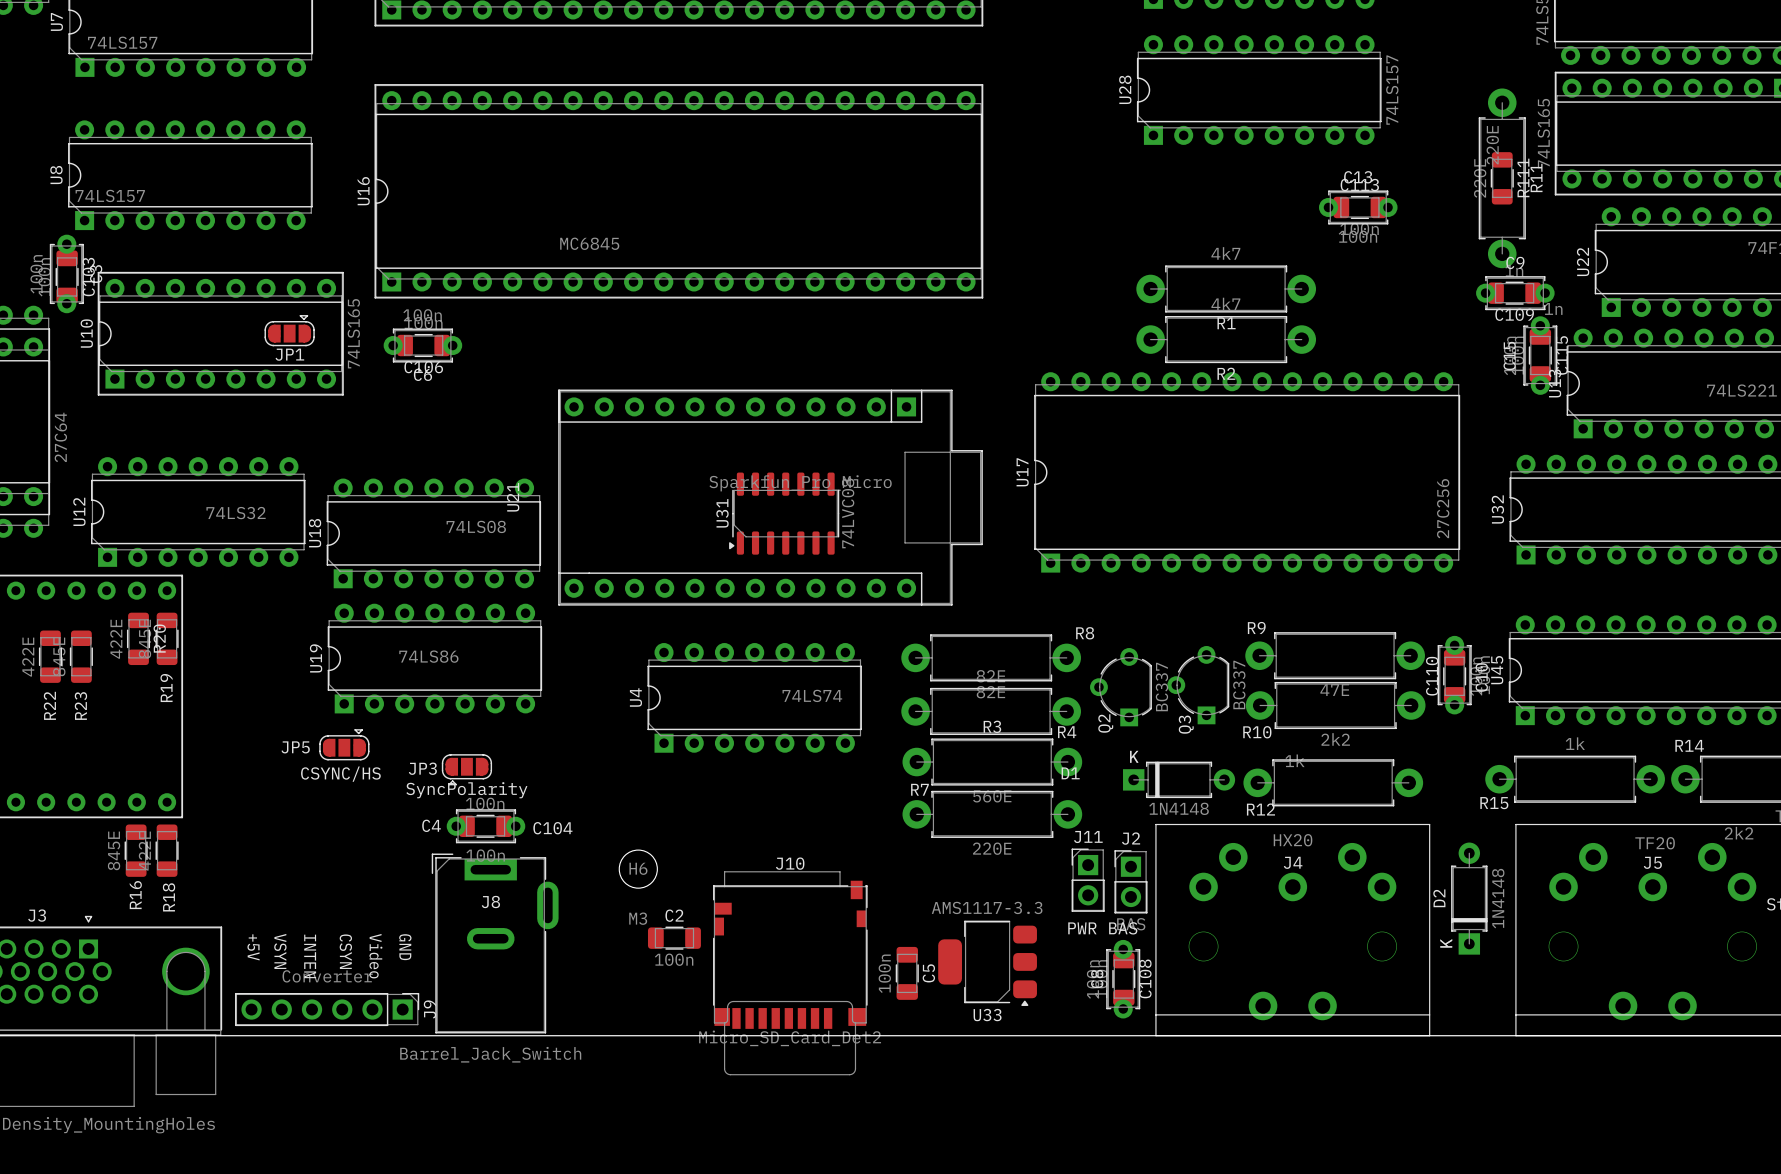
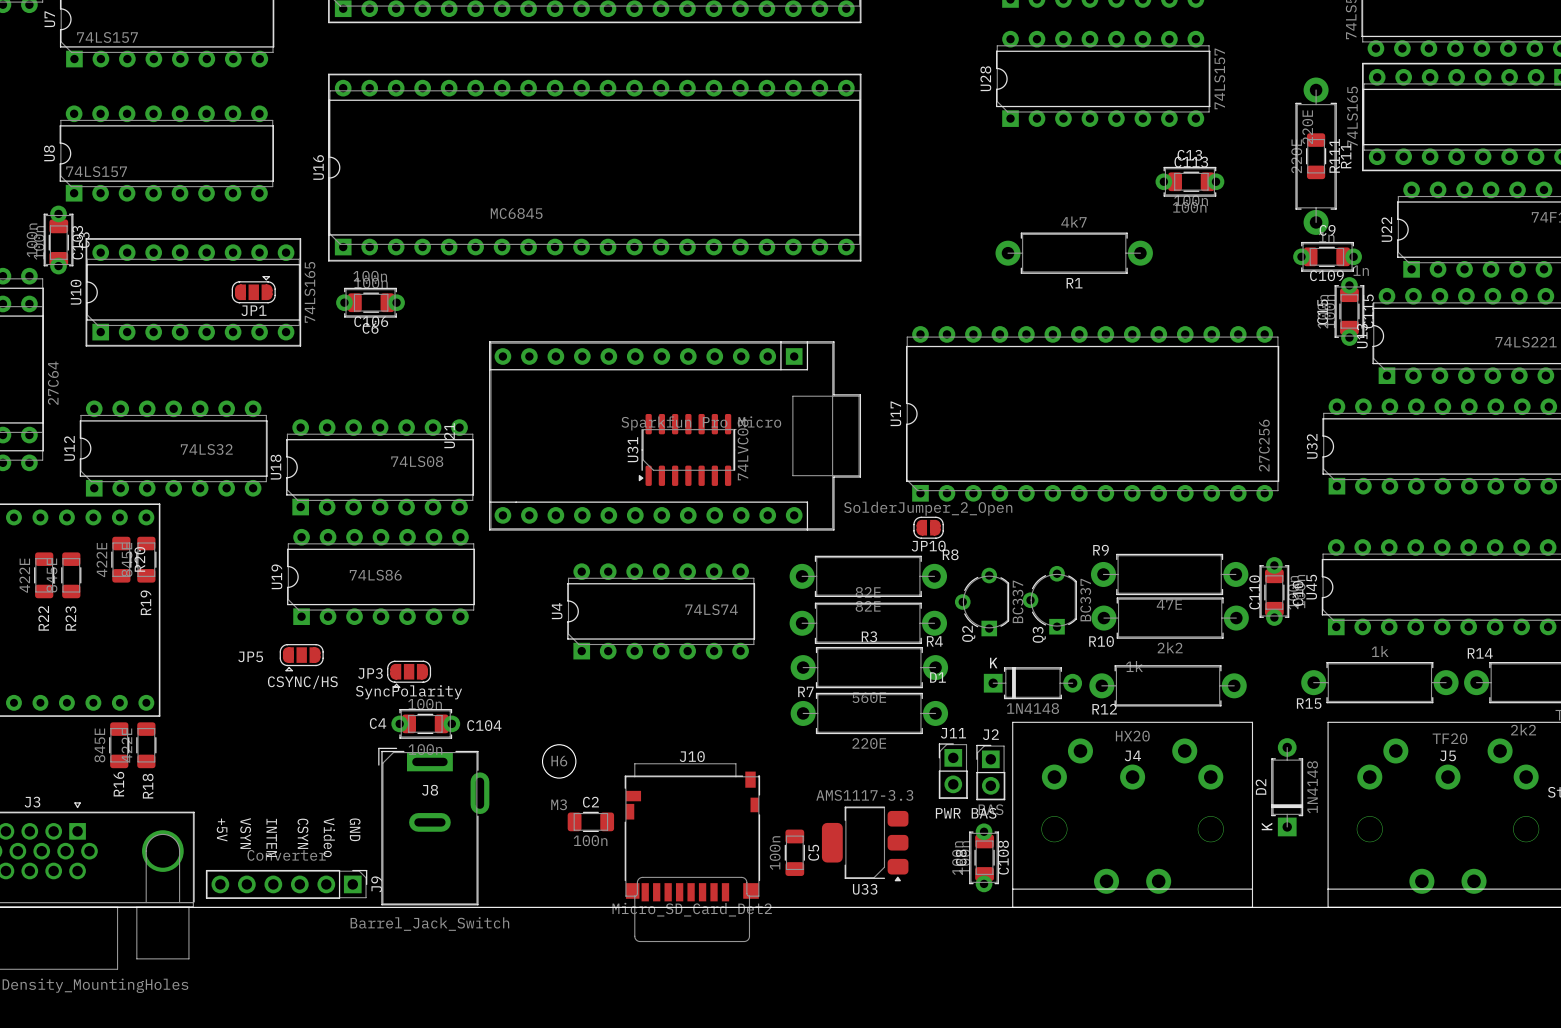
R2: 4k7 (1226, 339) -> none
JP10: none -> SolderJumper_2_Open (928, 527)
JP5 rotation: 0° (344, 744) -> 180° (301, 657)

